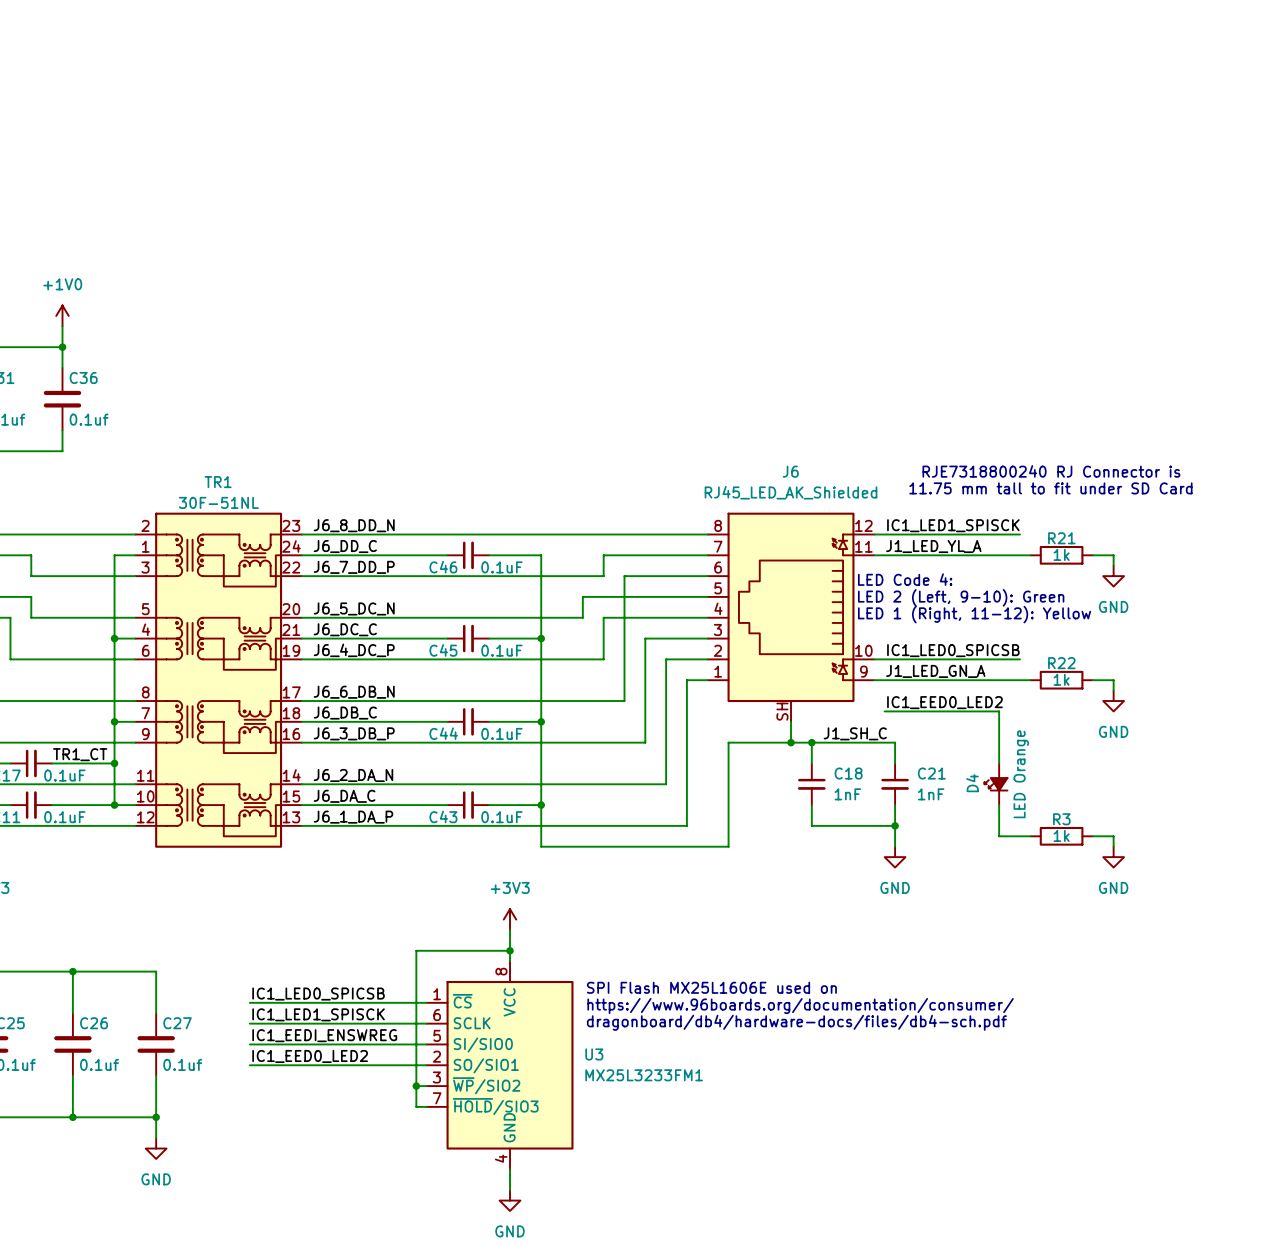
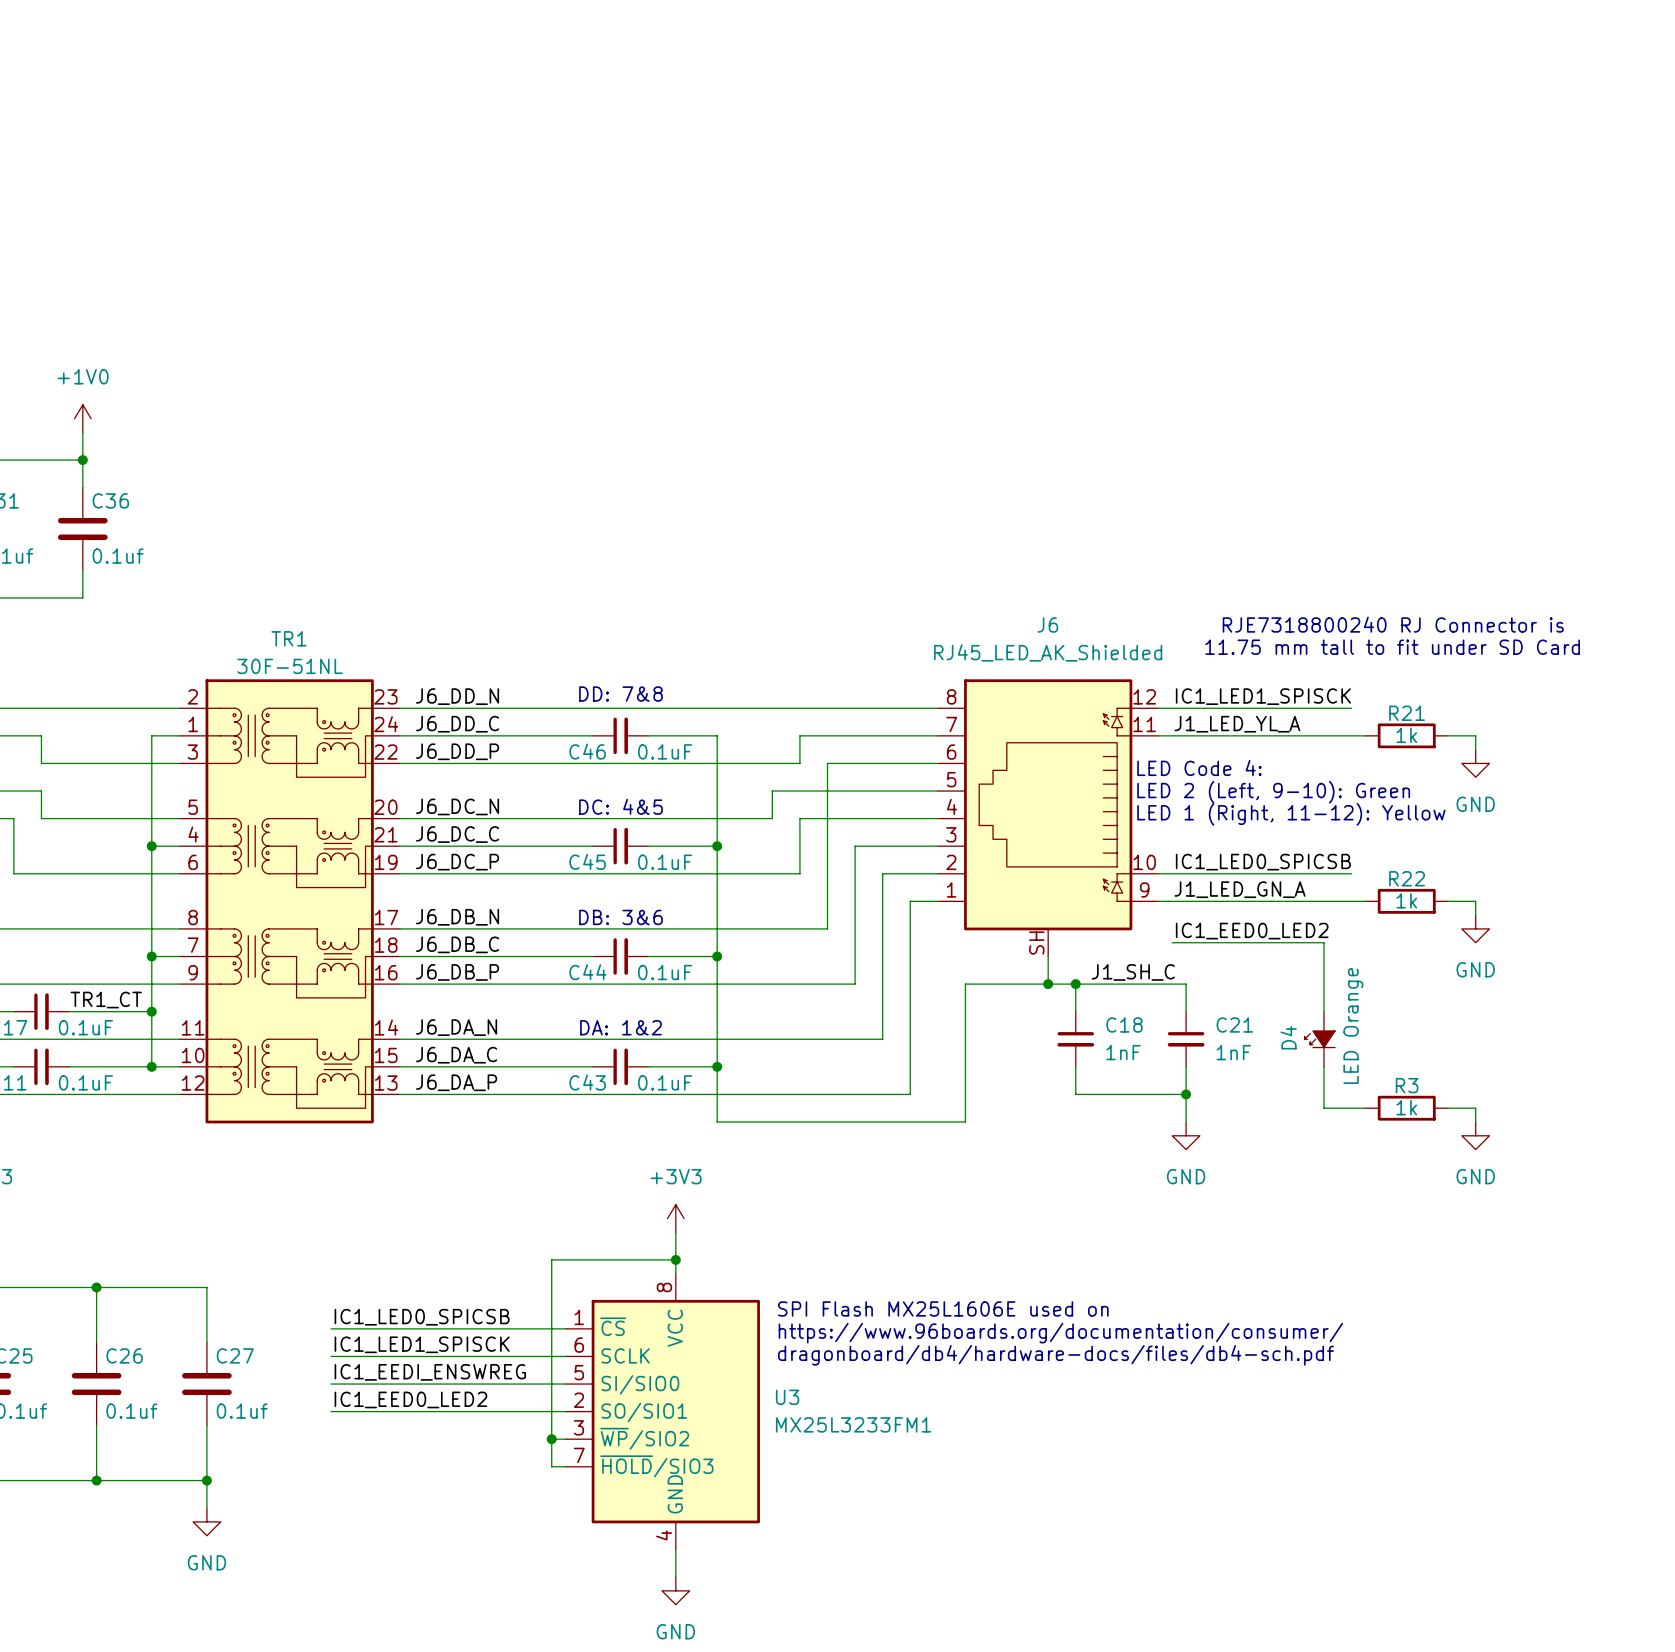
text: none -> DD: 7&8 (620, 694)
label: J6_8_DD_N (354, 525) -> J6_DD_N (457, 696)
label: J6_7_DD_P (354, 567) -> J6_DD_P (457, 751)
label: J6_5_DC_N (354, 608) -> J6_DC_N (457, 806)
text: none -> DC: 4&5 (620, 806)
label: J6_4_DC_P (354, 650) -> J6_DC_P (457, 862)
label: J6_6_DB_N (354, 692) -> J6_DB_N (457, 917)
text: none -> DB: 3&6 (620, 917)
label: J6_3_DB_P (354, 733) -> J6_DB_P (457, 972)
label: J6_2_DA_N (353, 775) -> J6_DA_N (456, 1027)
text: none -> DA: 1&2 (620, 1027)
label: J6_1_DA_P (353, 817) -> J6_DA_P (456, 1082)

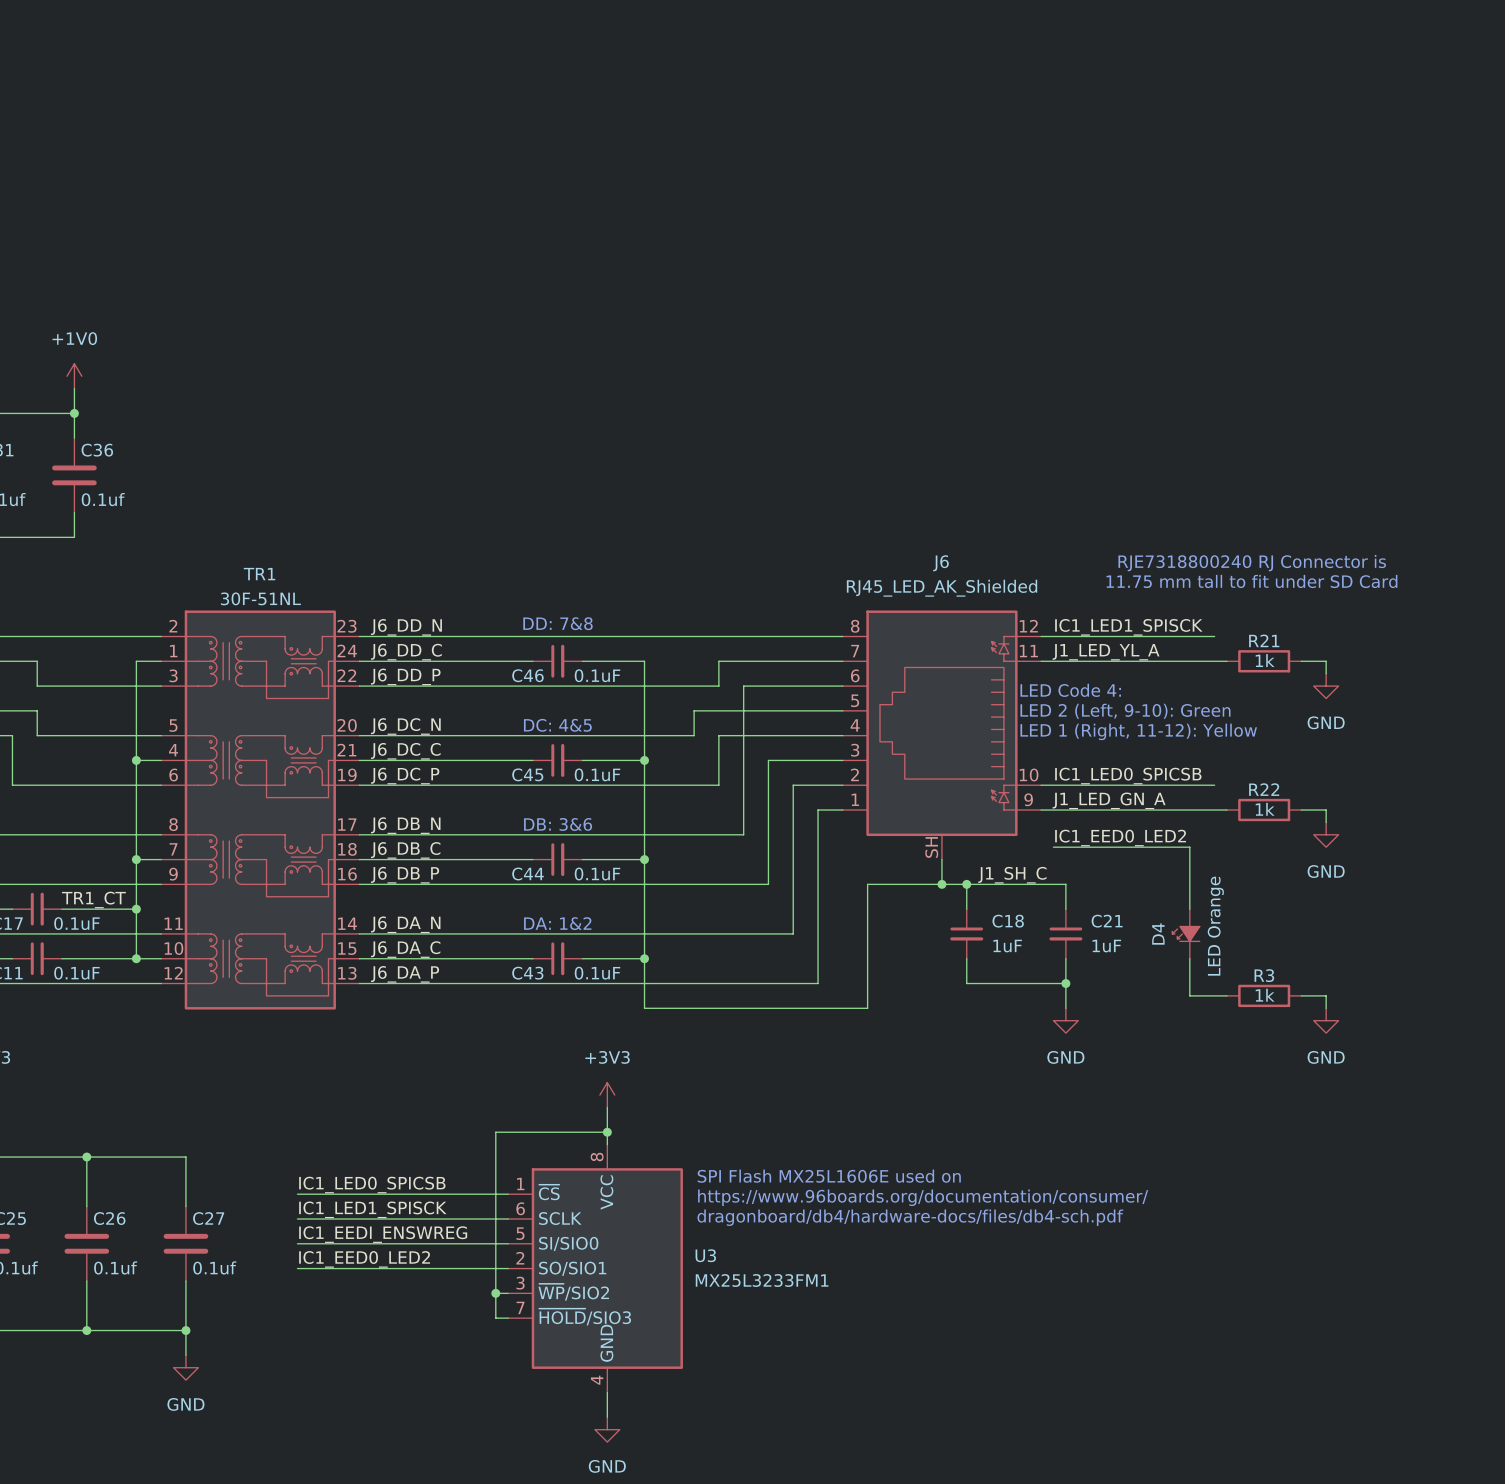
C18 value: 1nF (1123, 1052) -> 1uF (1007, 946)
C21 value: 1nF (1233, 1052) -> 1uF (1106, 946)

